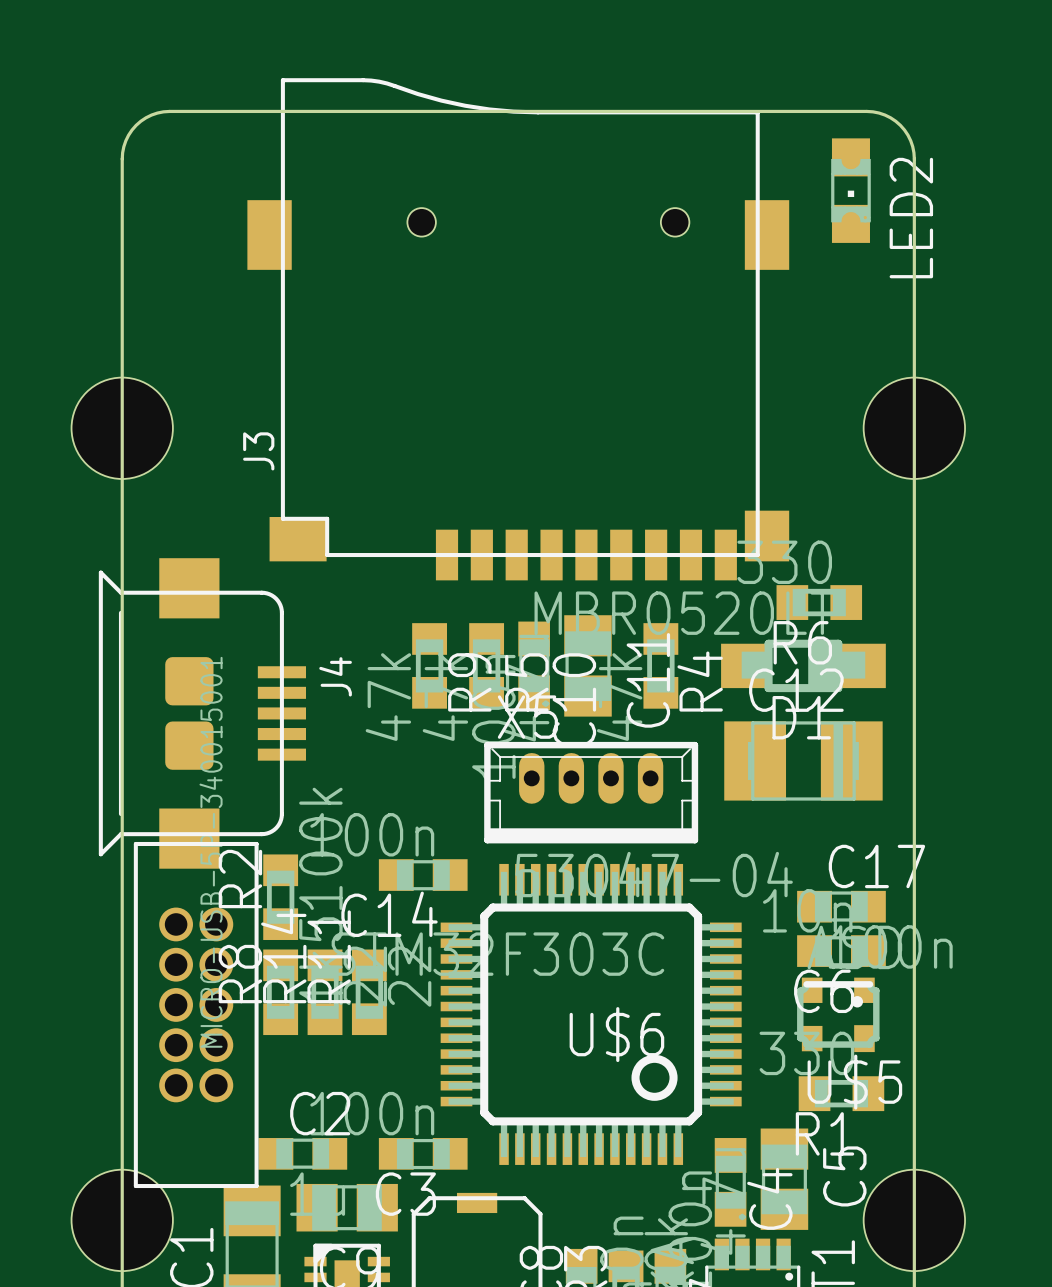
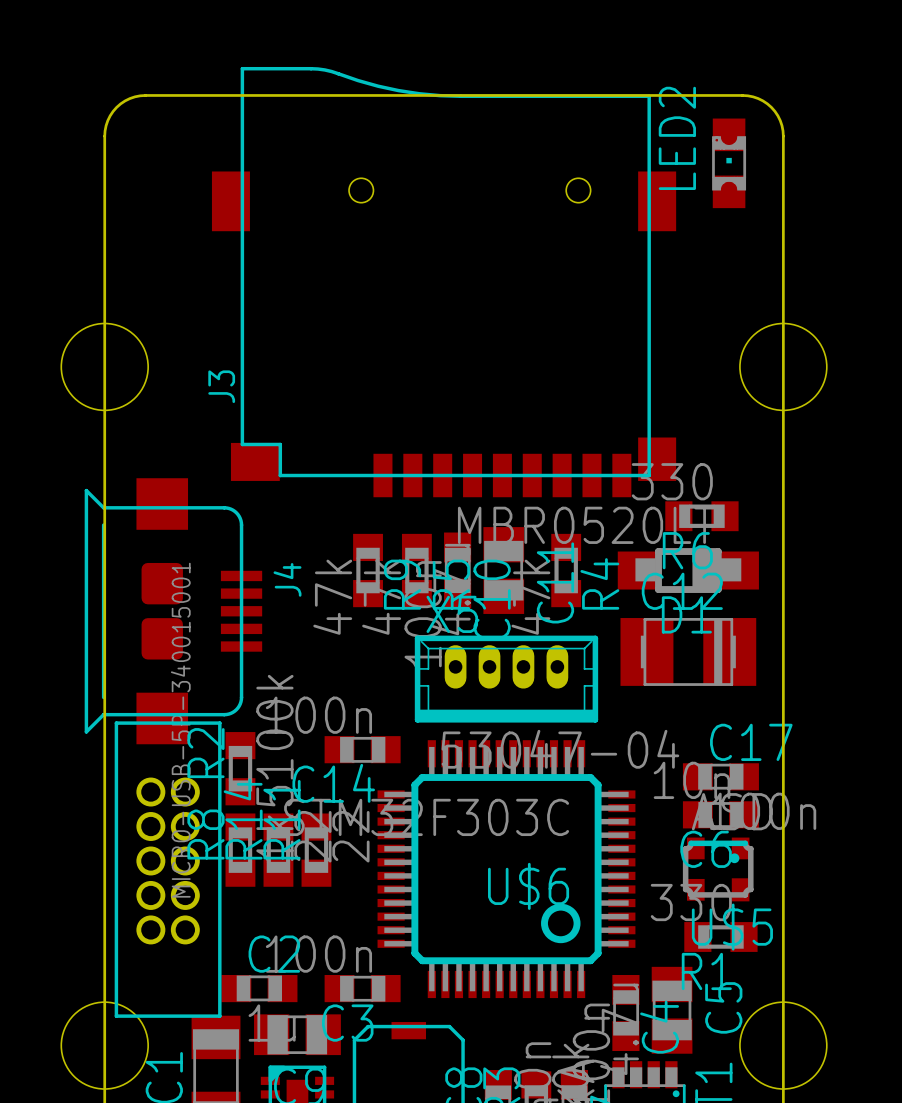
LED2 rotation: 0° (850, 190) -> 180° (729, 163)

